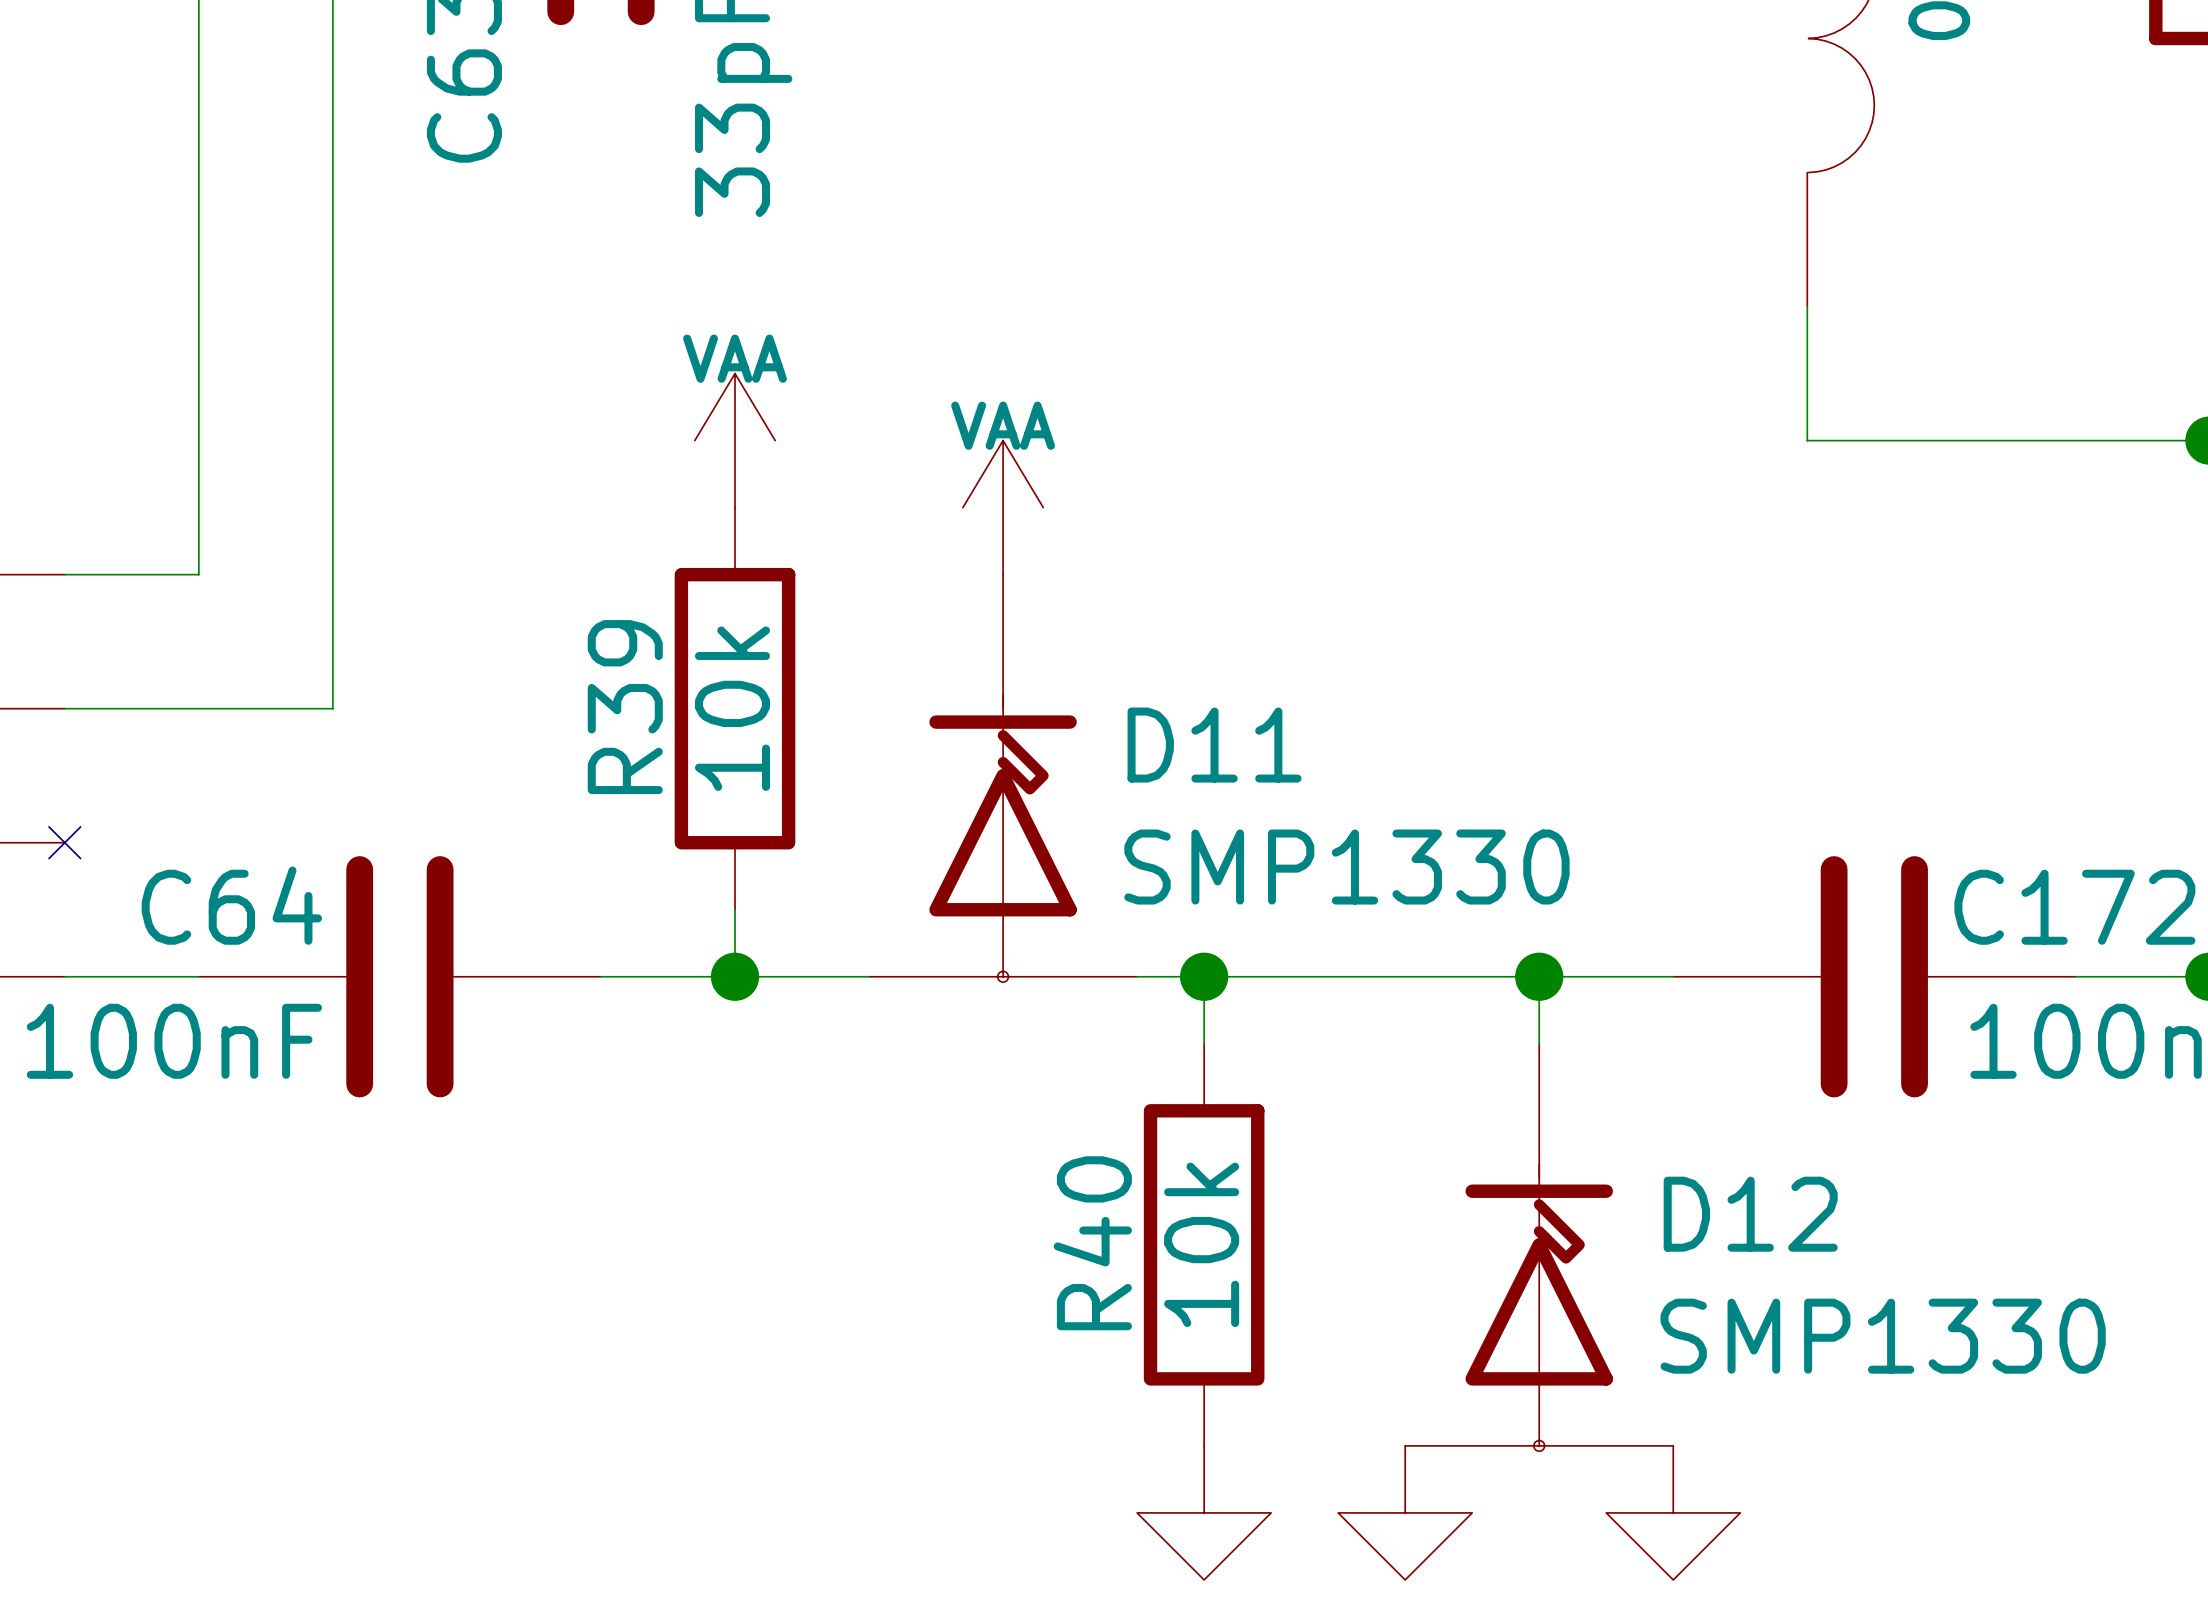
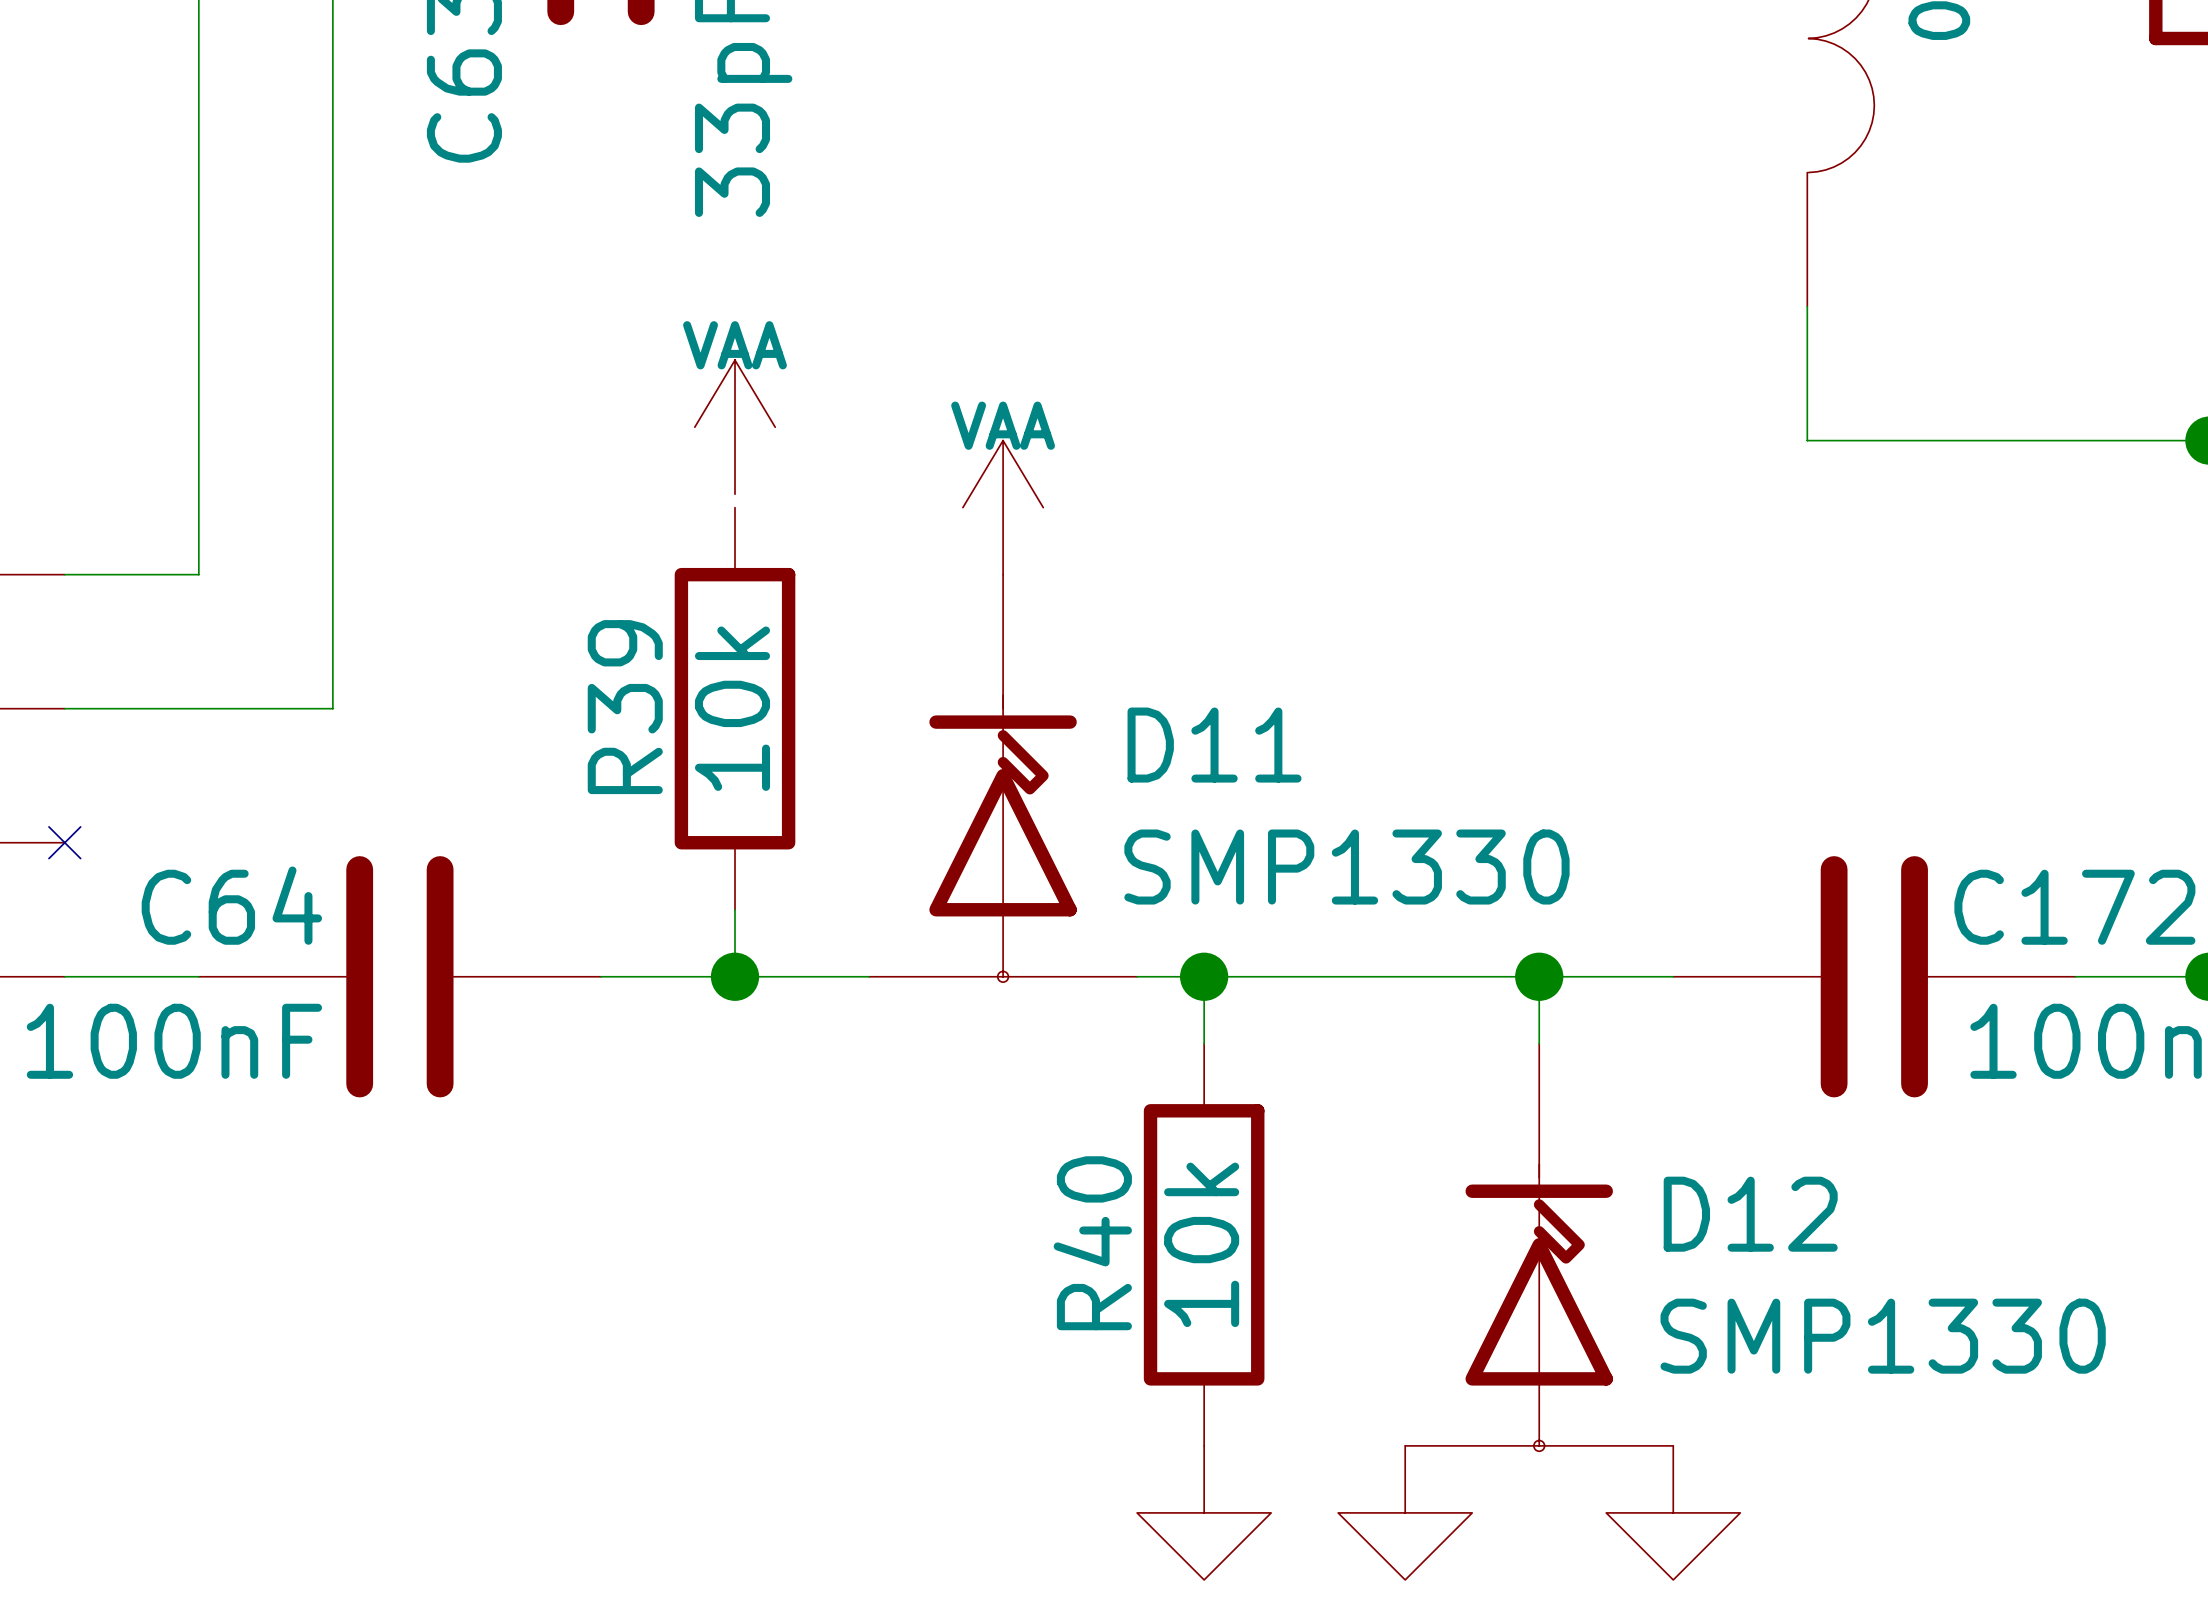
power symbol position: VAA (735, 440) -> VAA (735, 427)

